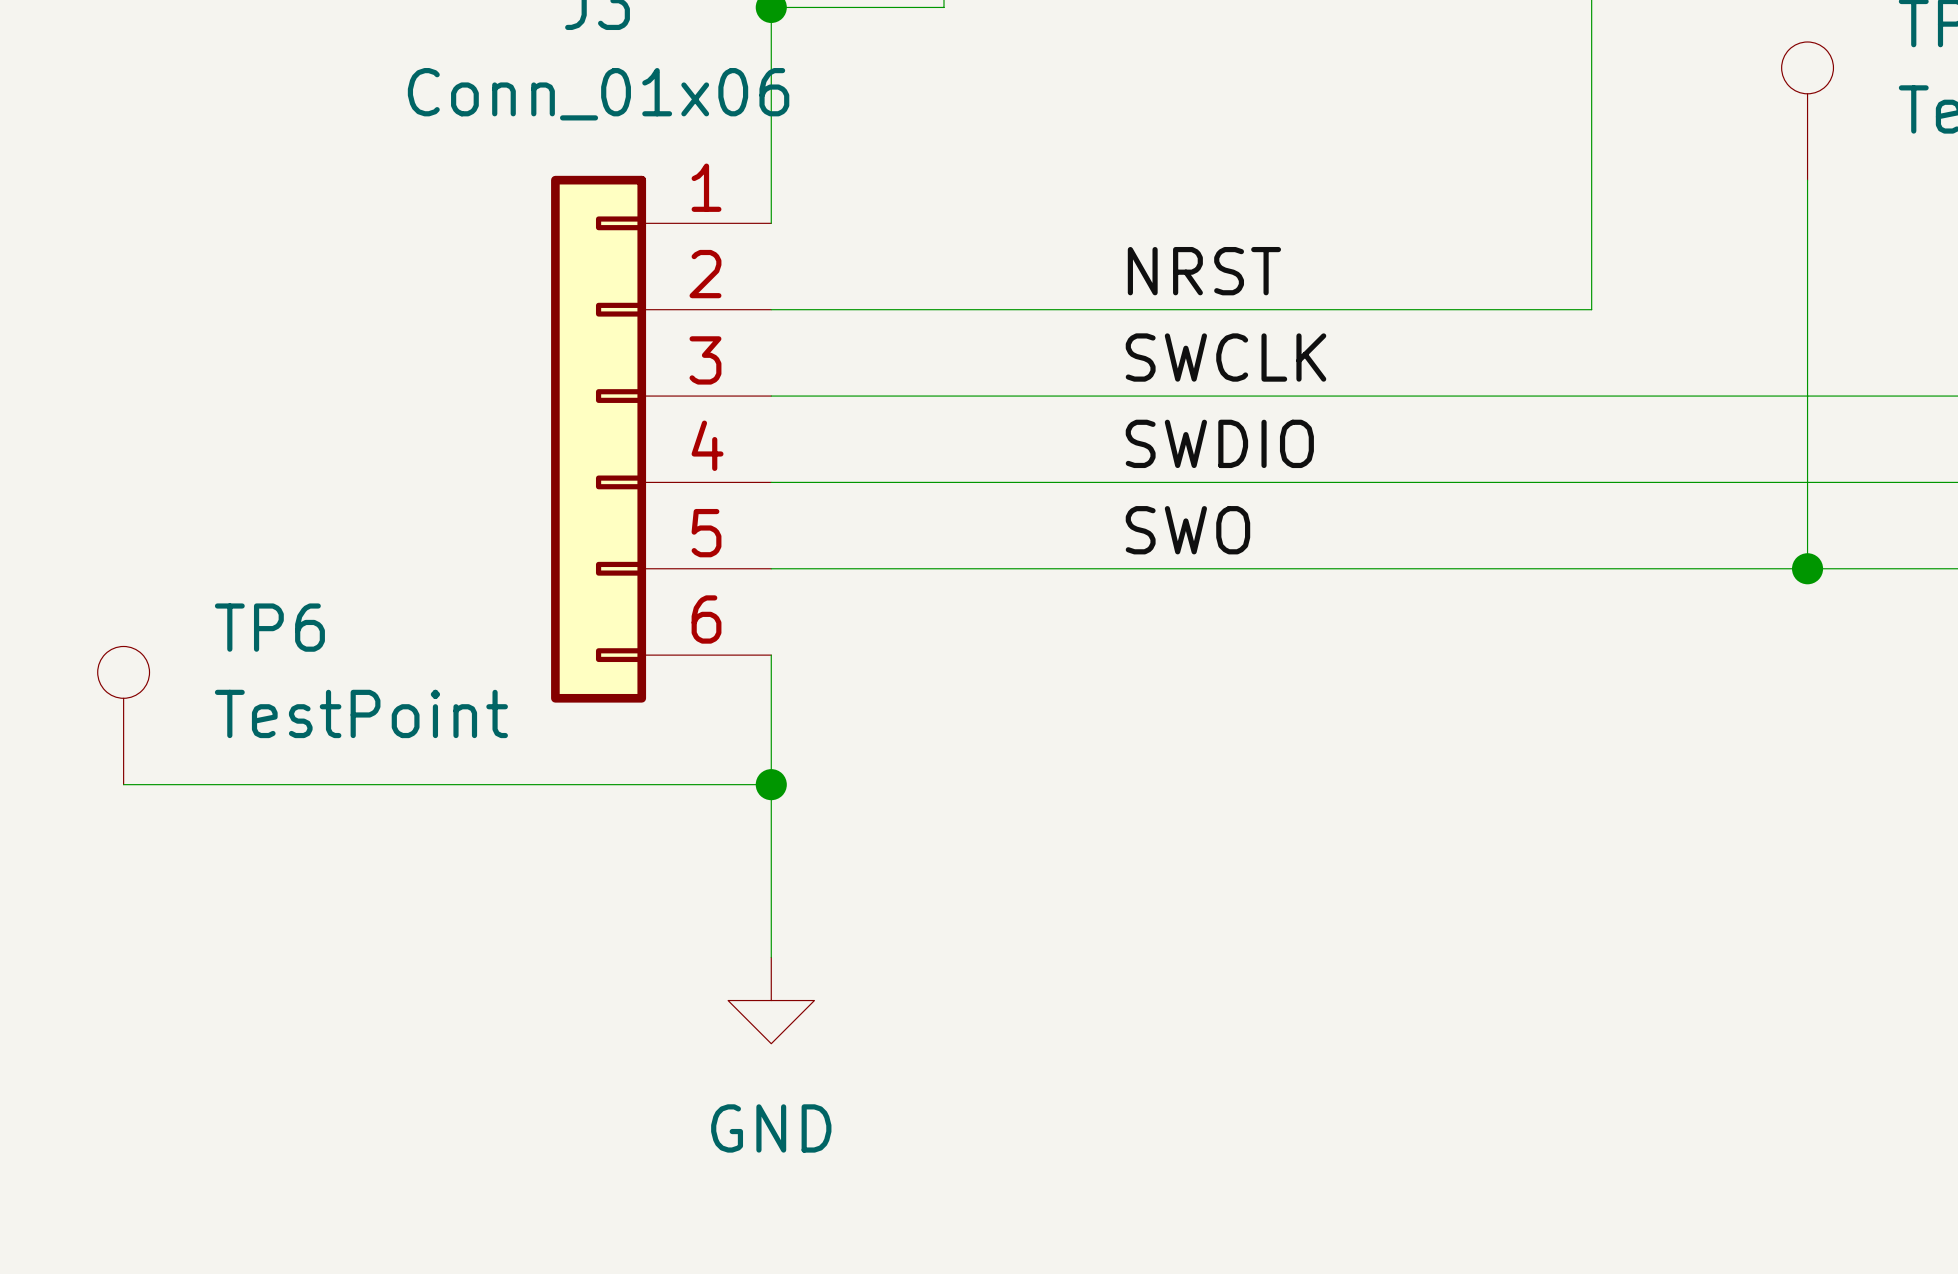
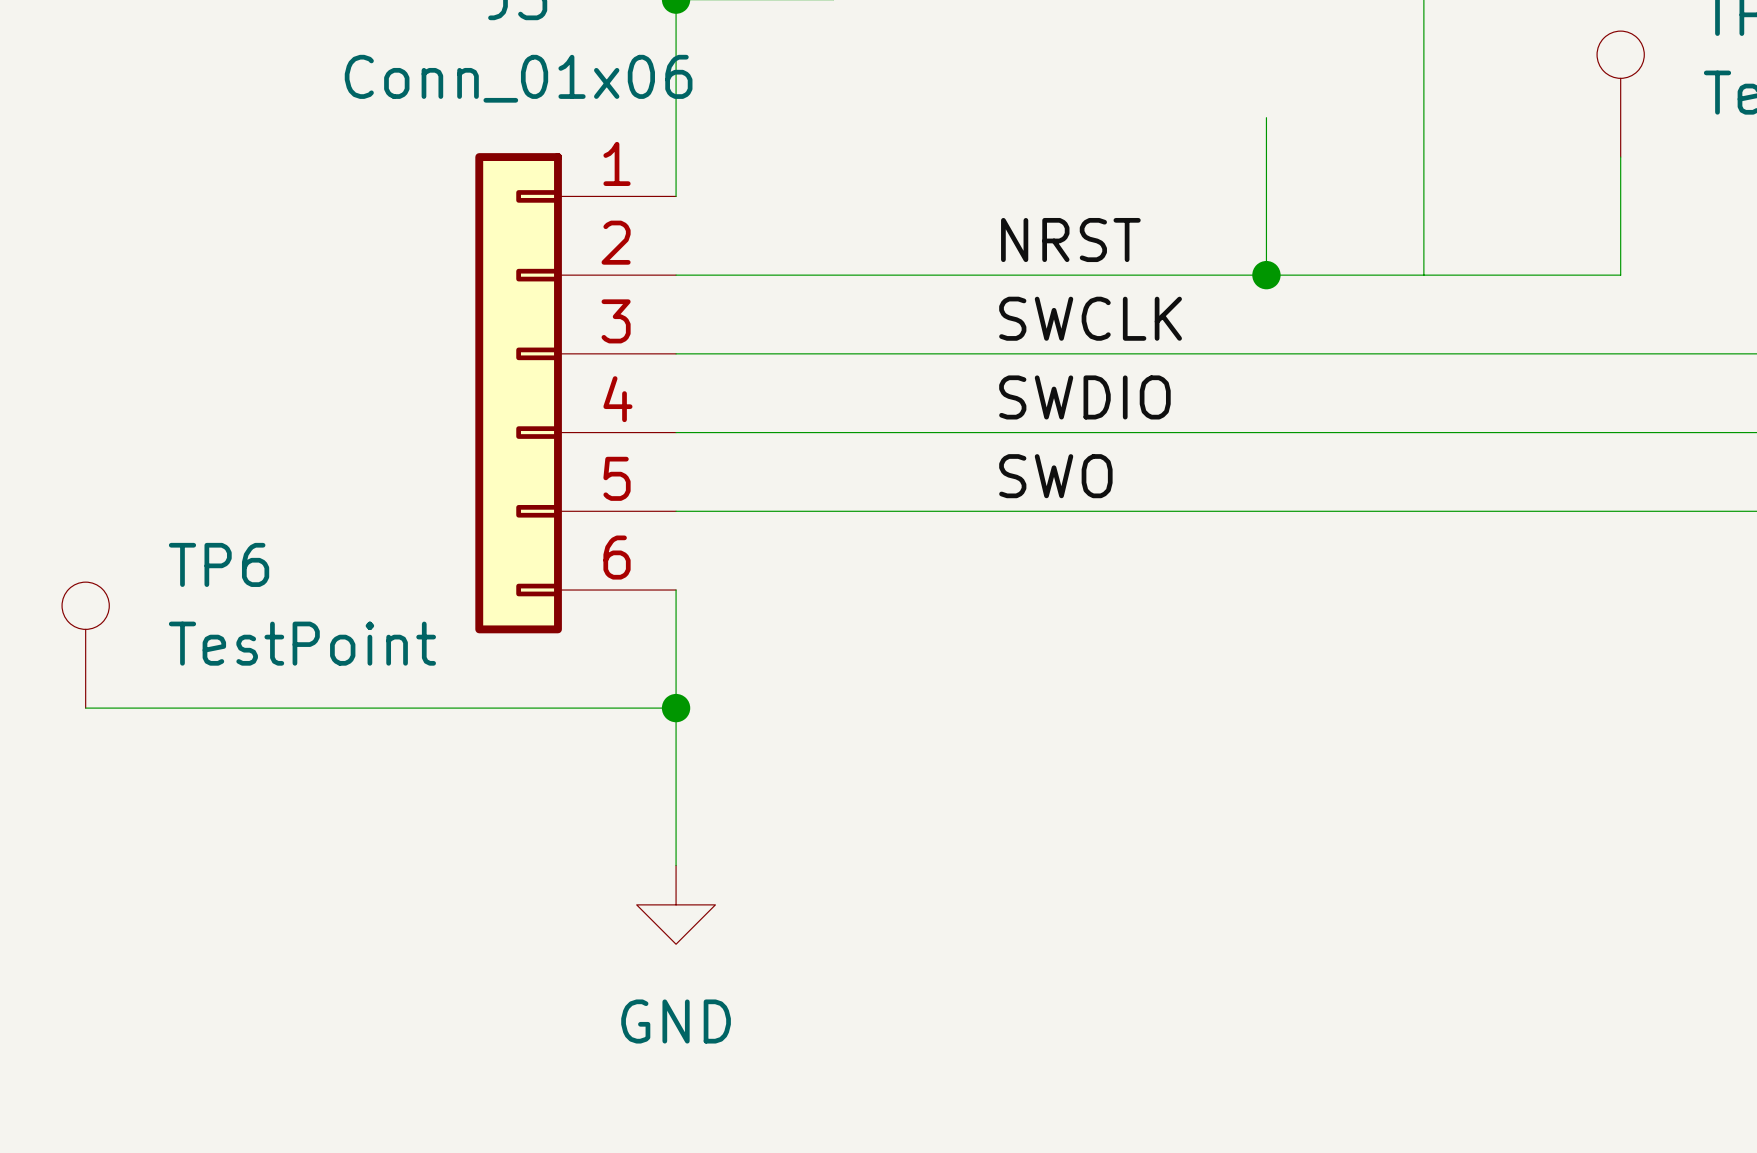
wire: none -> (1266, 117) (1266, 275)
junction: none -> (1266, 275)
wire: (1807, 309) (1807, 568) -> (1620, 275) (1423, 275)
junction: (1807, 568) -> none

